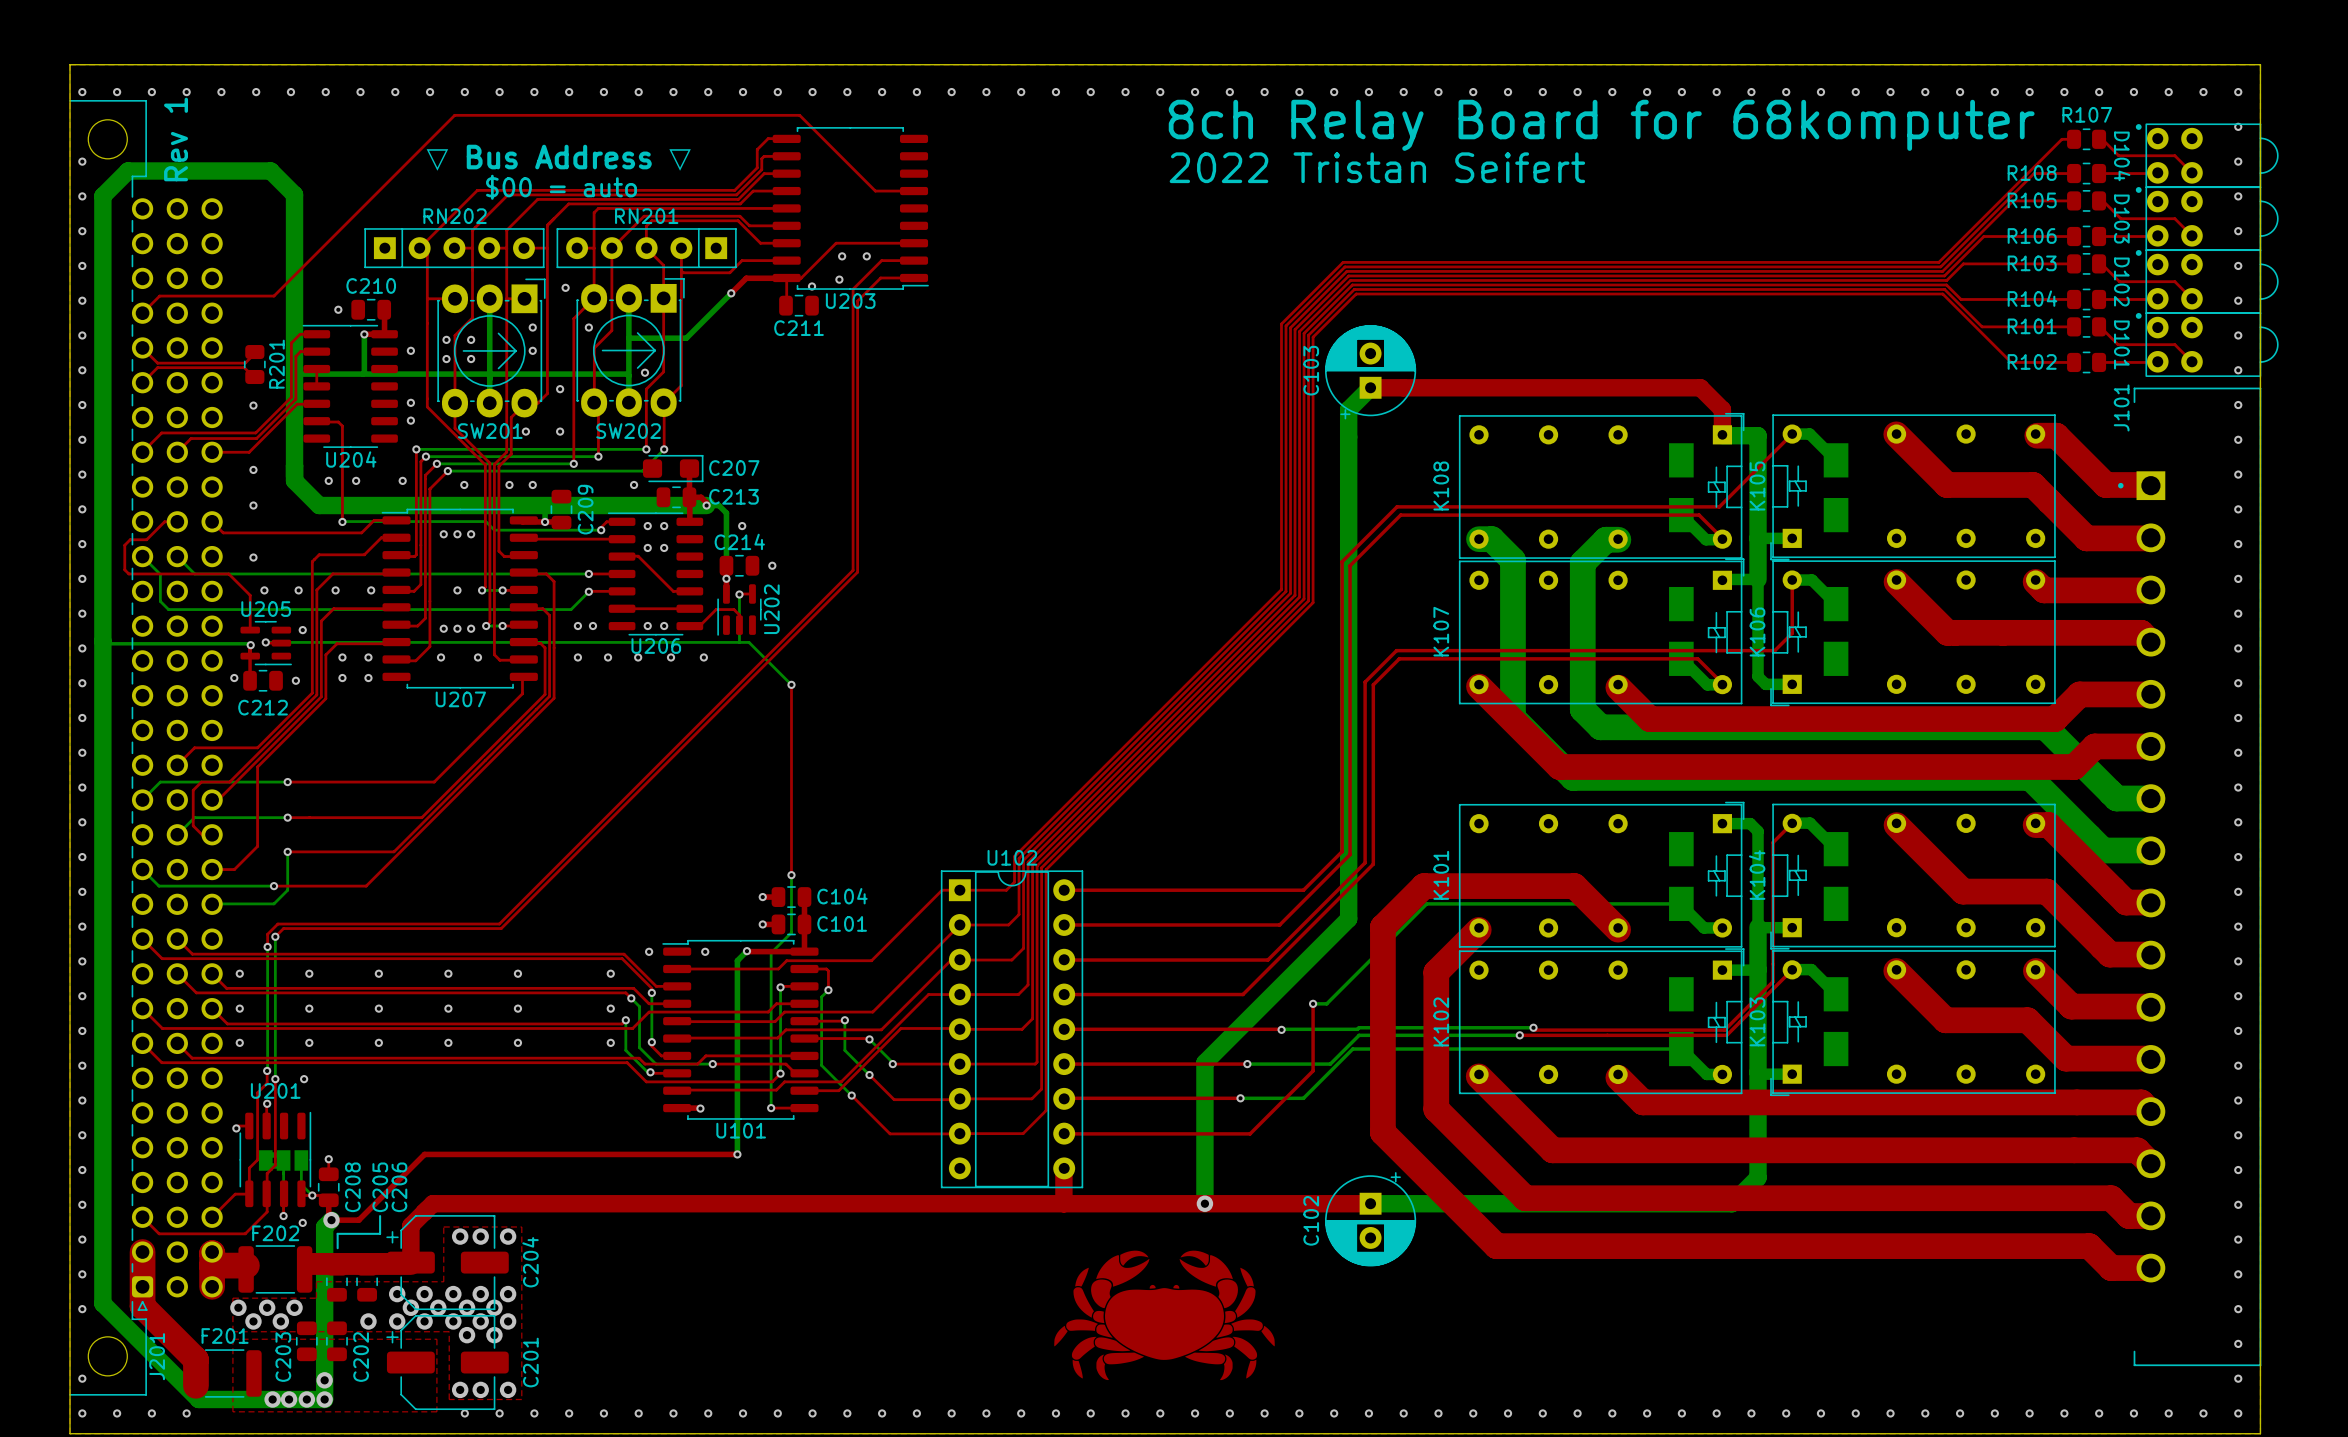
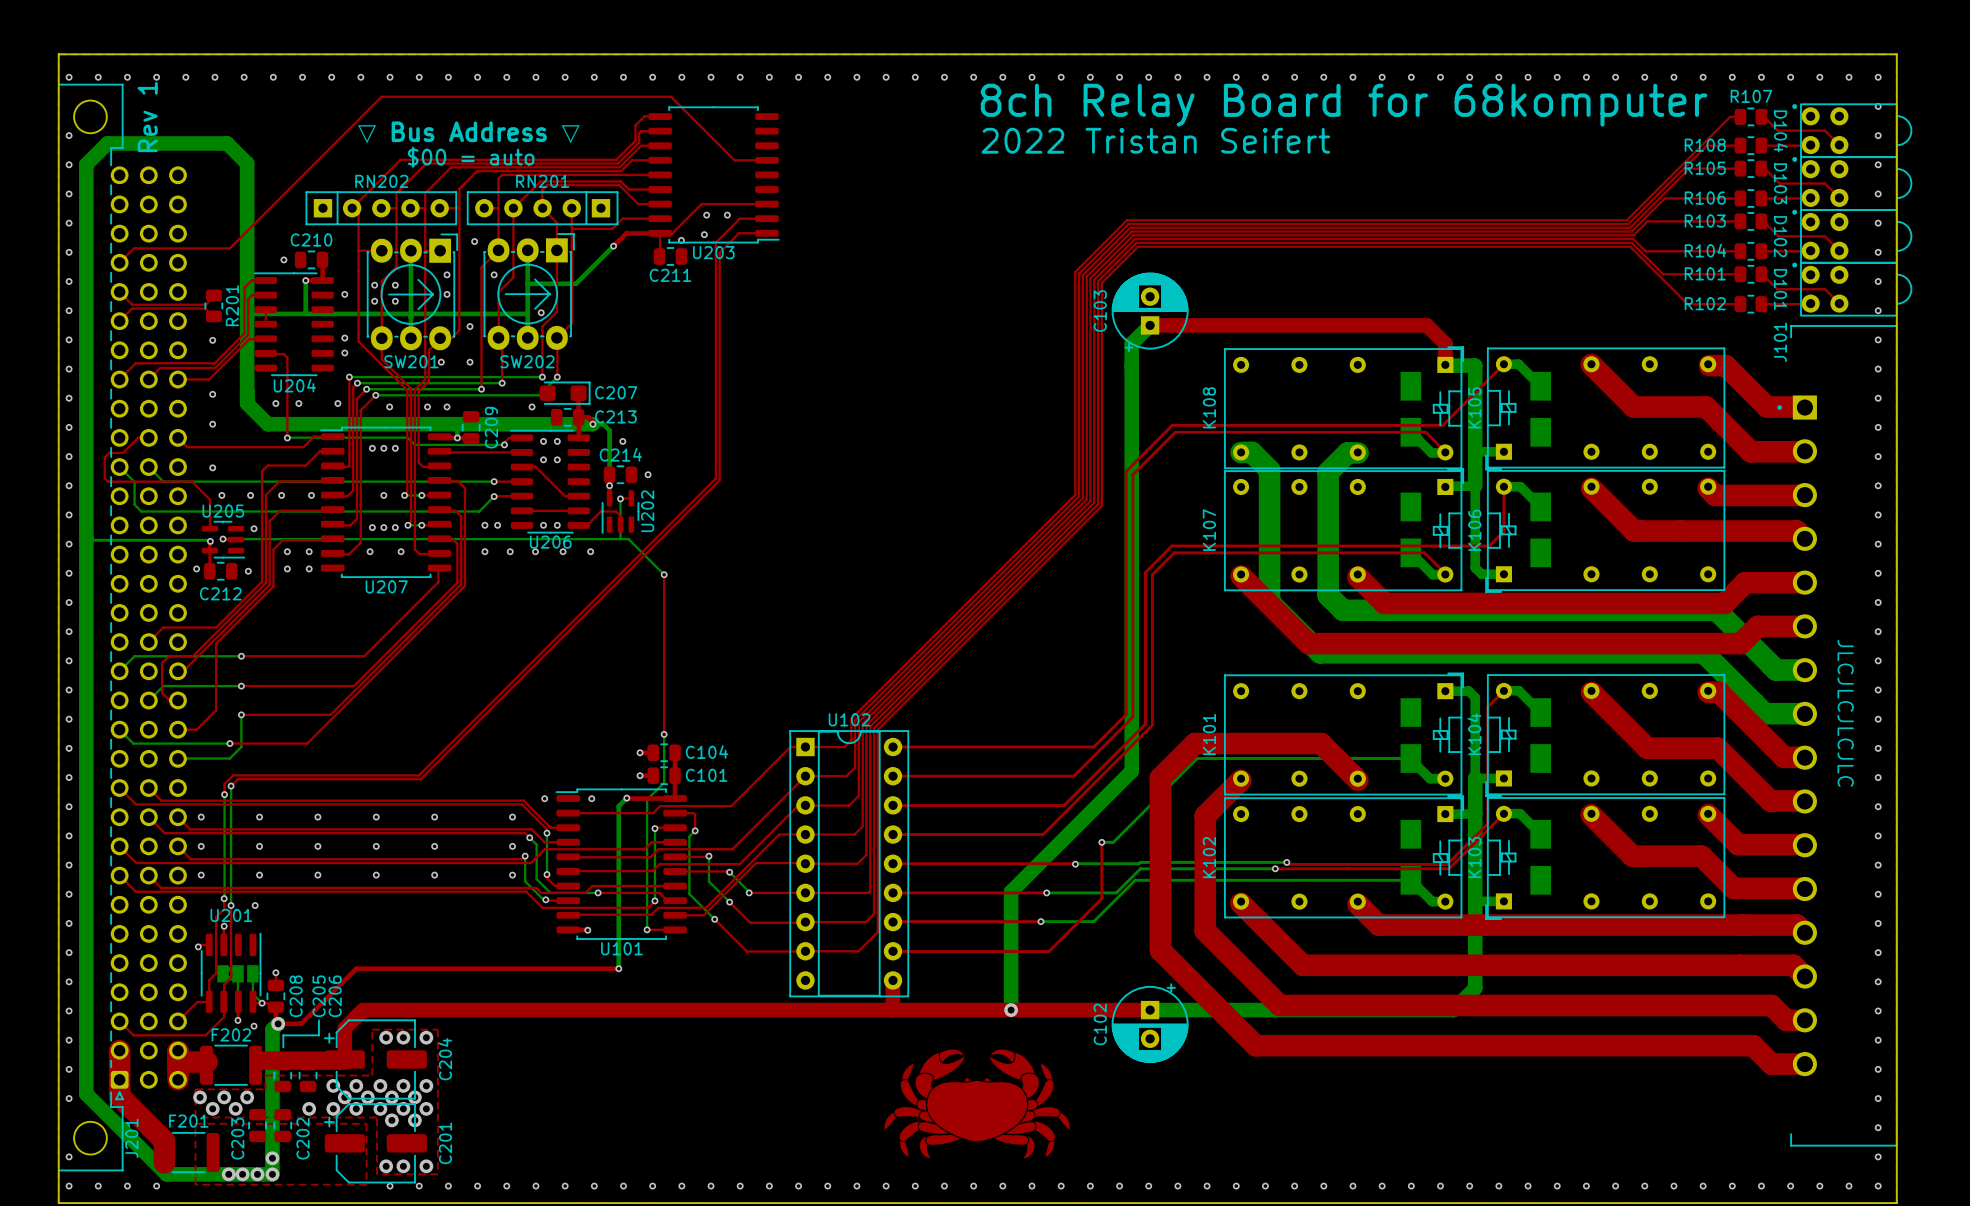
text: none -> JLCJLCJLCJLC (1845, 713)

